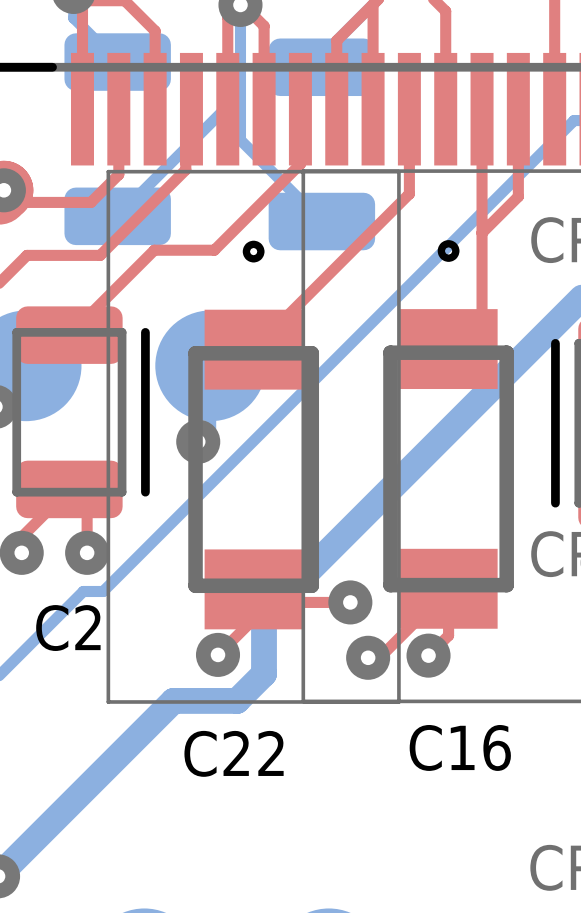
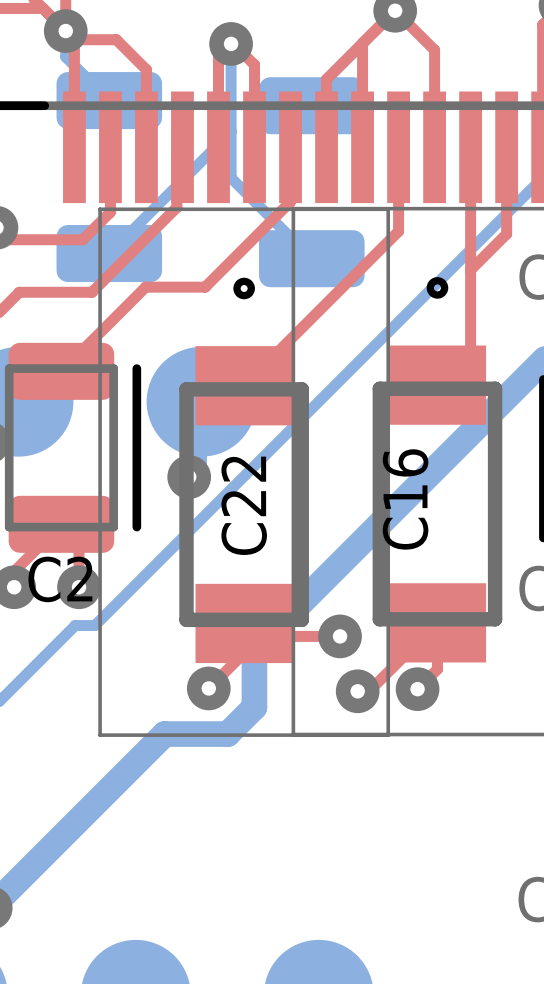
C2 name position: C2 (68, 628) -> C2 (60, 579)
C16 name rotation: 0° (460, 747) -> 90° counterclockwise (405, 499)
C16 name position: C16 (460, 747) -> C16 (405, 499)
C22 name rotation: 0° (234, 753) -> 90° counterclockwise (244, 505)
C22 name position: C22 (234, 753) -> C22 (244, 505)

